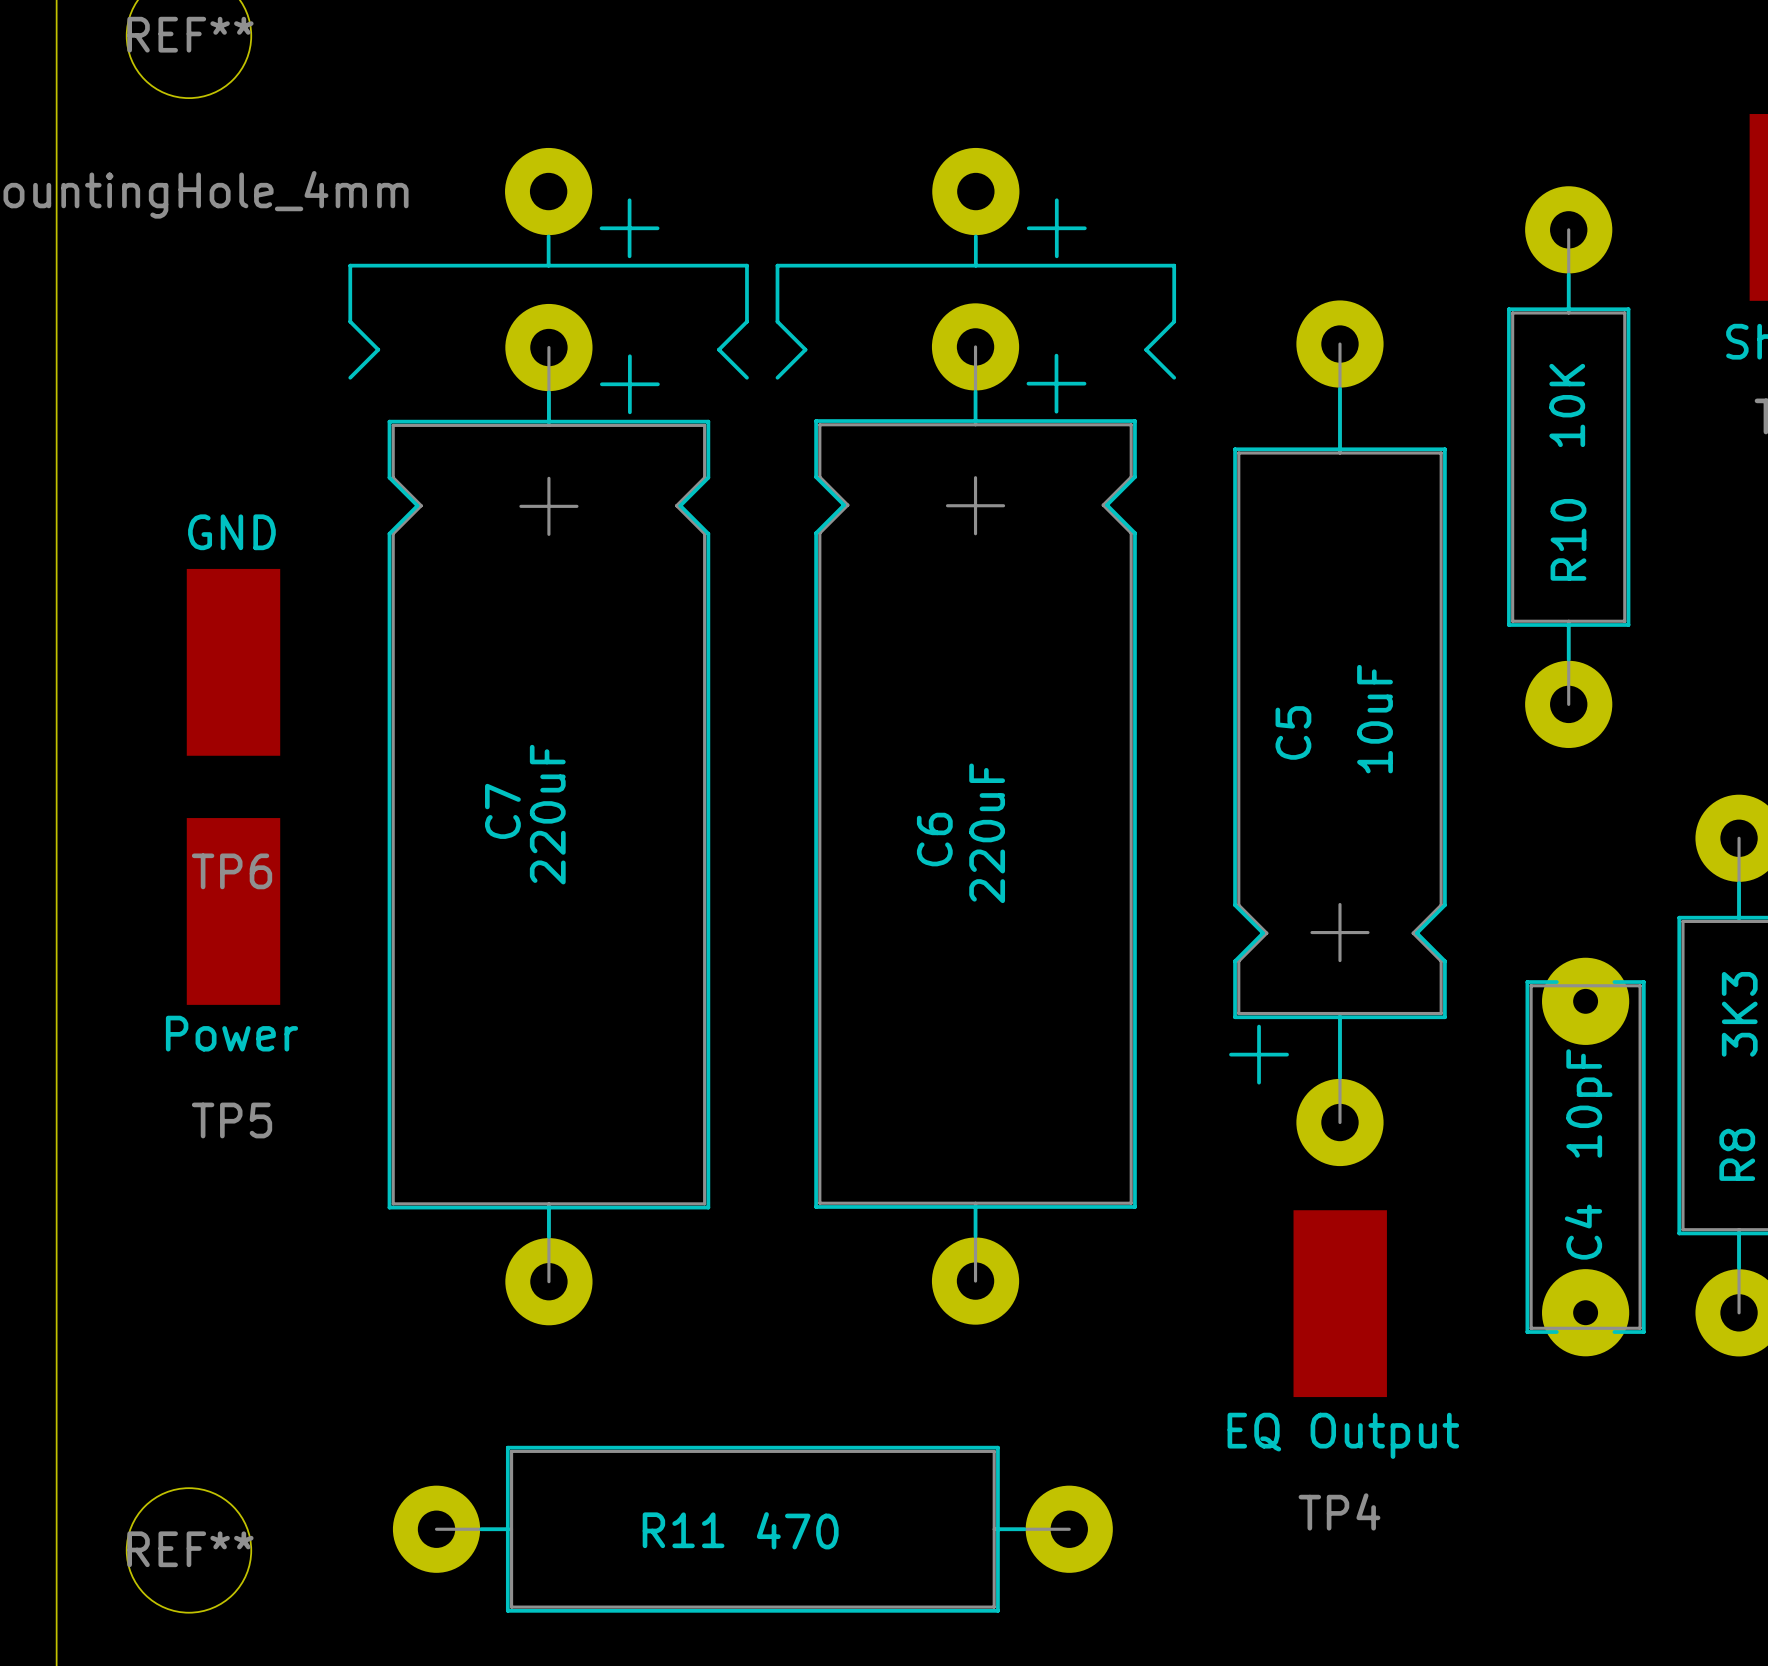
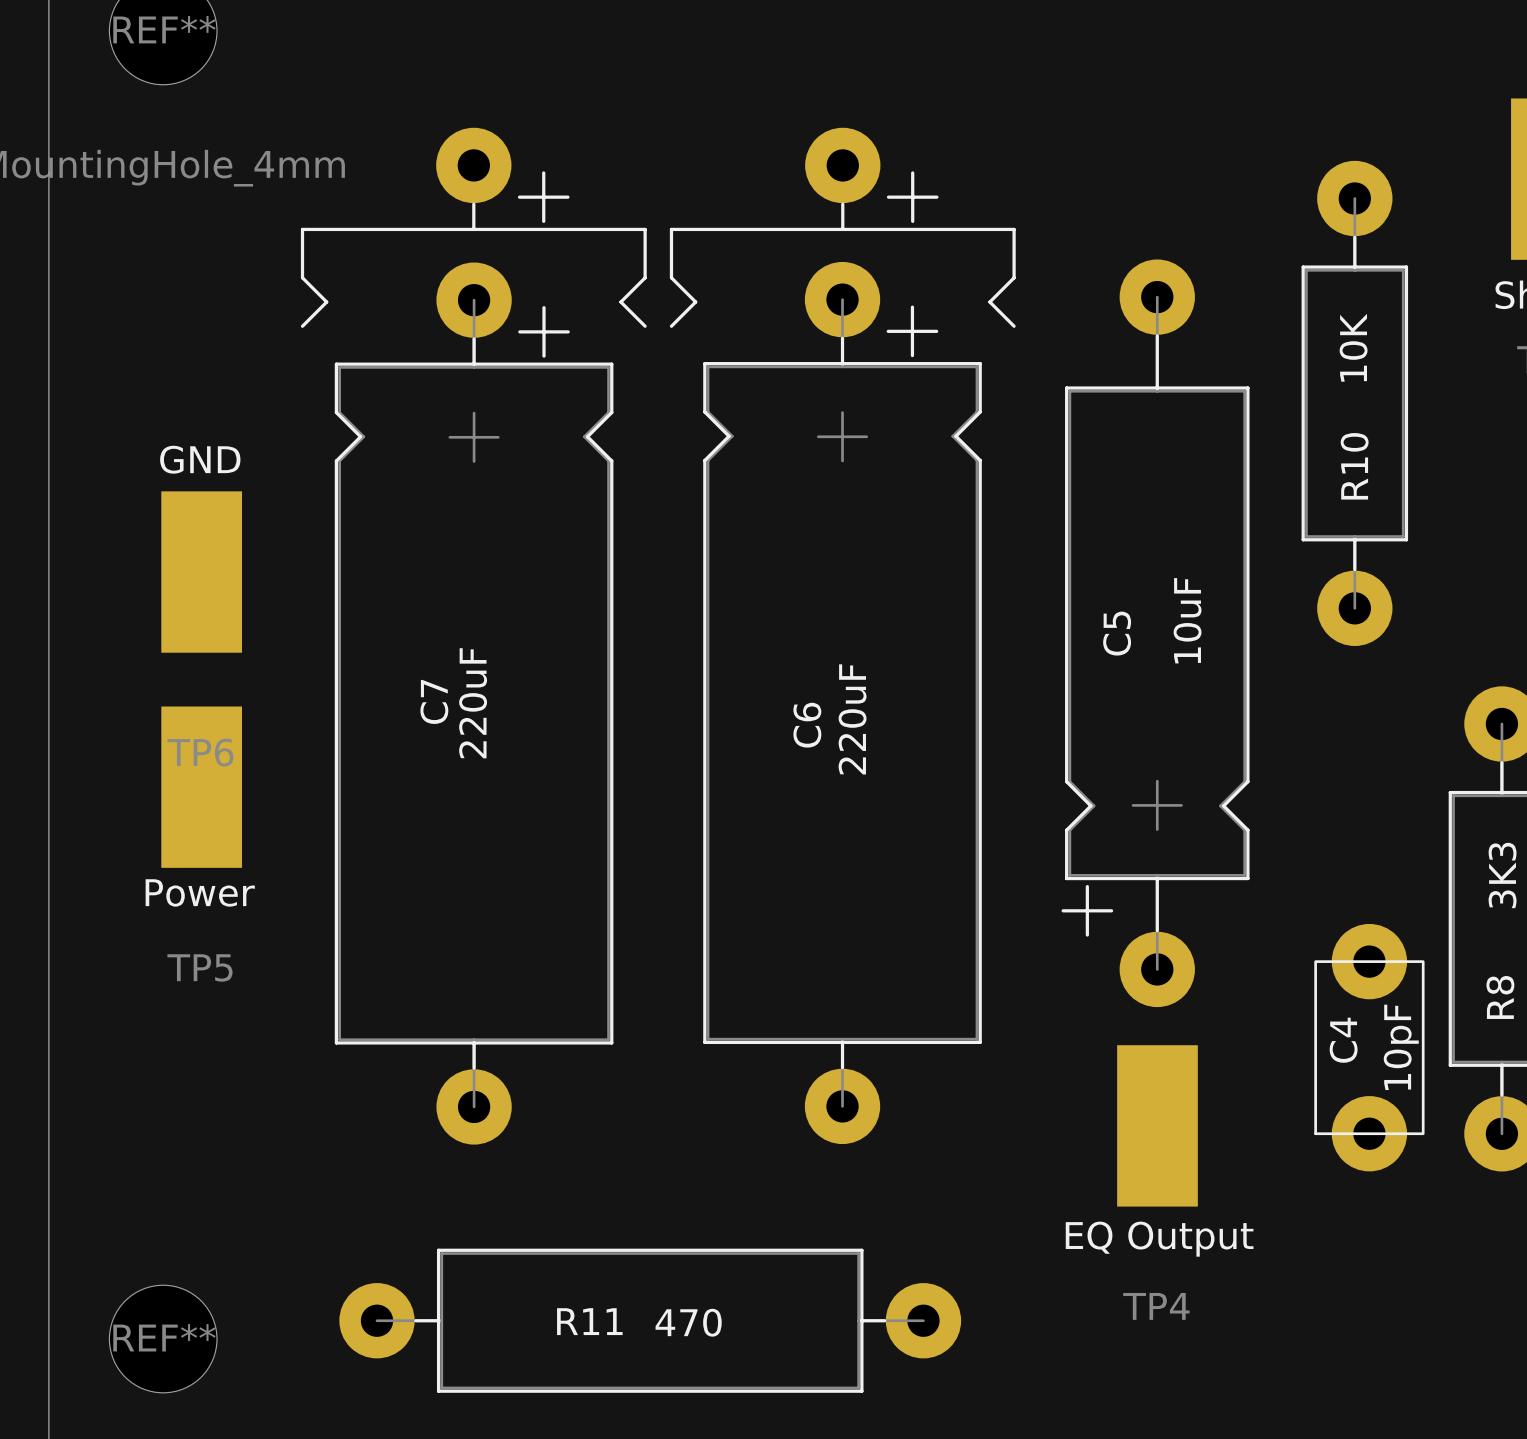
C4 footprint: [1525, 957, 1646, 1357] -> [1314, 923, 1425, 1172]
C4 value position: 10pF (1589, 1103) -> 10pF (1401, 1047)
C4 name position: C4 (1583, 1232) -> C4 (1343, 1040)

